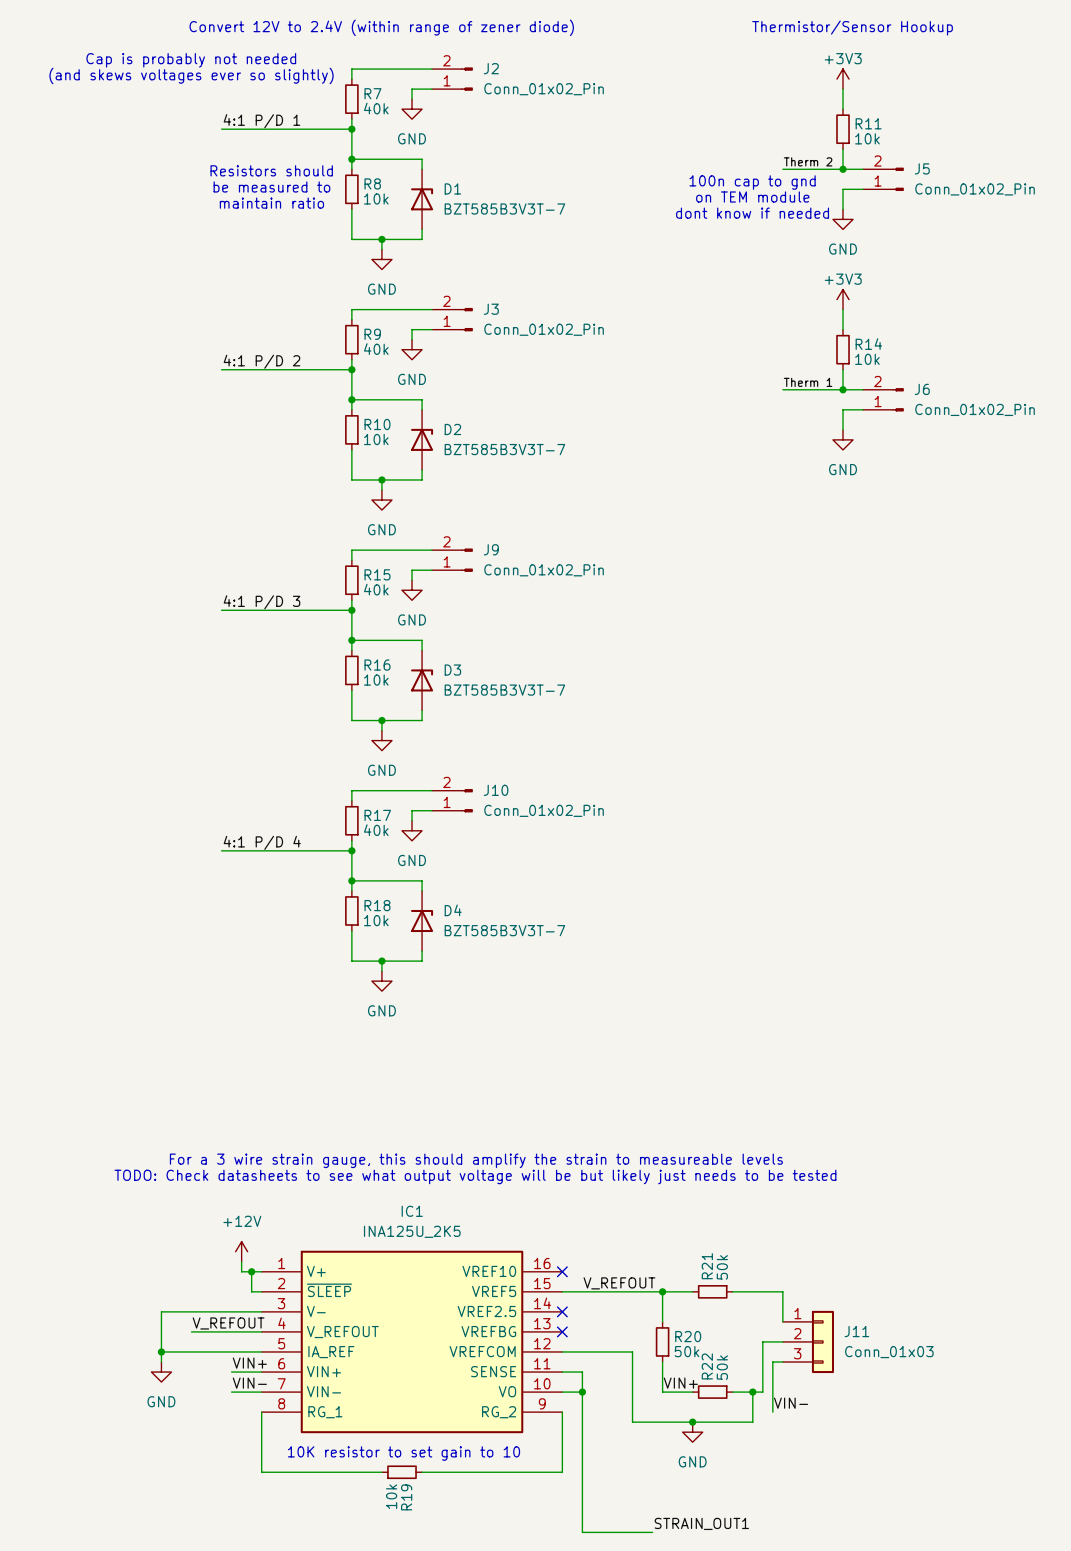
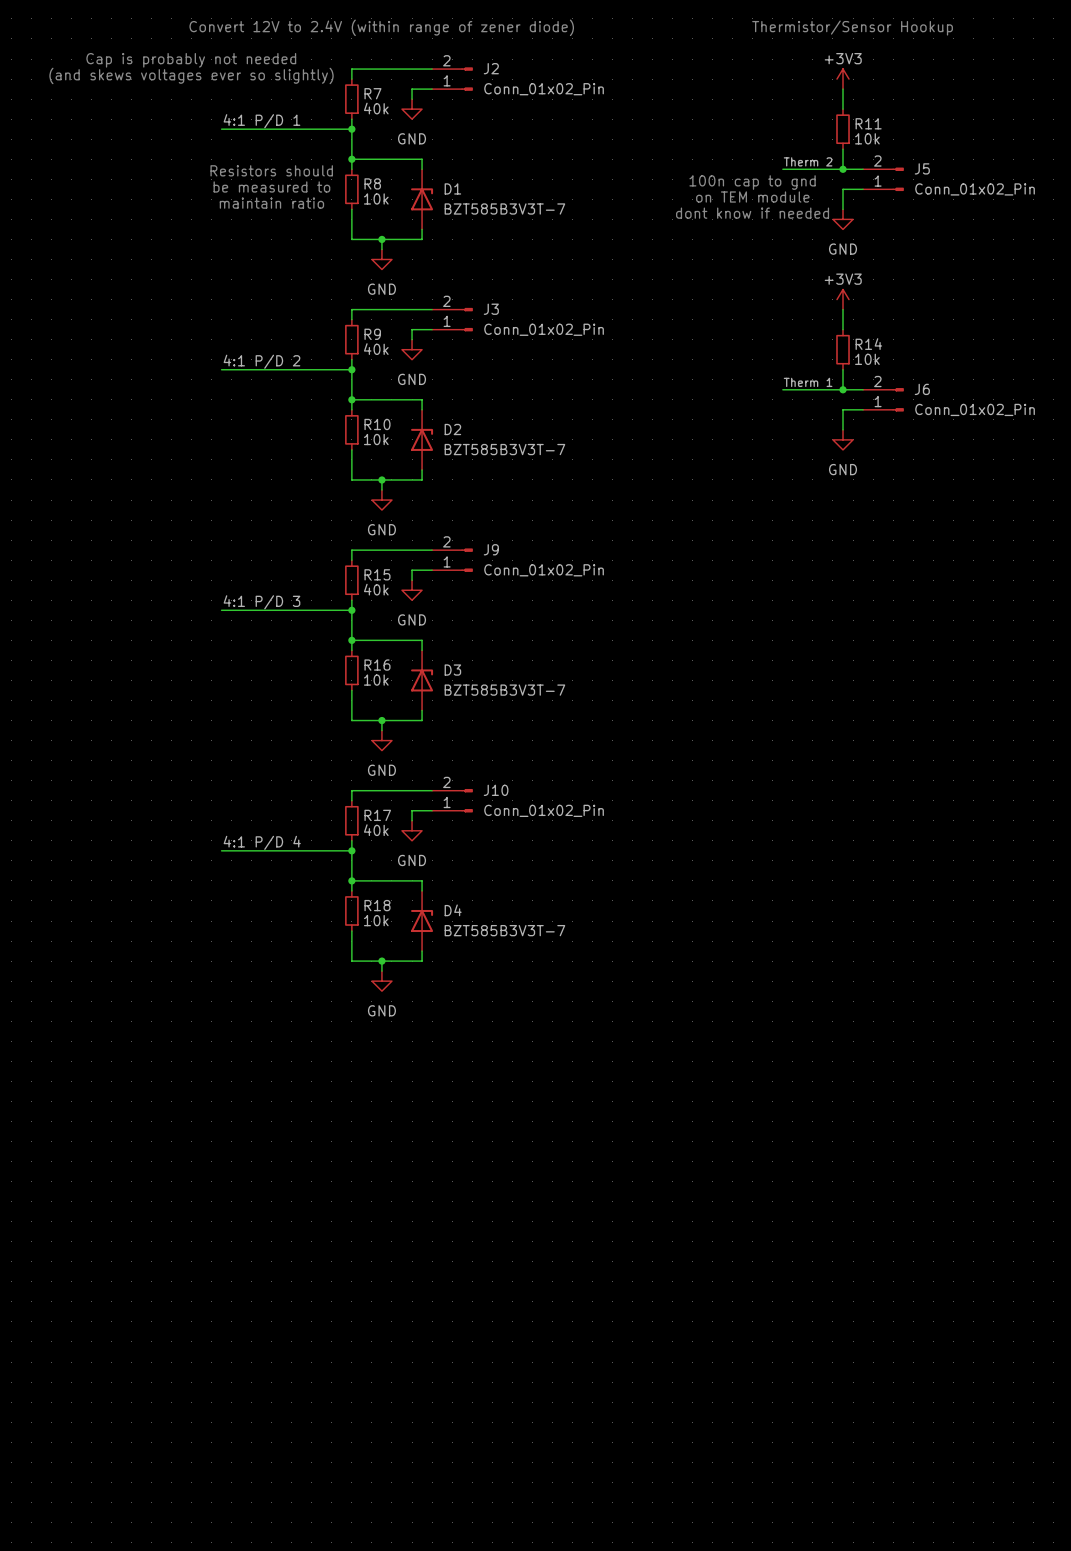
text: For a 3 wire strain gauge, this should amplify the strain to measureable levels (476, 1160) -> none
text: TODO: Check datasheets to see what output voltage will be but likely just needs to be tested (475, 1176) -> none
power symbol: +12V (241, 1251) -> none
wire: (241, 1261) (241, 1271) (261, 1271) -> none
wire: (251, 1271) (251, 1291) (261, 1291) -> none
junction: (251, 1271) -> none
no-connect mark: (562, 1271) -> none
label: V_REFOUT (619, 1283) -> none
wire: (562, 1291) (692, 1291) -> none
wire: (662, 1291) (662, 1321) -> none
junction: (662, 1291) -> none
R21: 50k (712, 1291) -> none
wire: (732, 1291) (782, 1291) (782, 1321) -> none
wire: (261, 1311) (161, 1311) (161, 1362) -> none
no-connect mark: (562, 1311) -> none
label: V_REFOUT (228, 1323) -> none
wire: (191, 1331) (261, 1331) -> none
no-connect mark: (562, 1331) -> none
IC1: INA125U_2K5 (412, 1341) -> none
R20: 50k (662, 1341) -> none
wire: (782, 1341) (762, 1341) (762, 1392) (732, 1392) -> none
J11: Conn_01x03 (808, 1341) -> none
wire: (161, 1351) (261, 1351) -> none
junction: (161, 1351) -> none
wire: (562, 1351) (632, 1351) (632, 1422) (752, 1422) (752, 1392) -> none
wire: (662, 1362) (662, 1392) (692, 1392) -> none
wire: (782, 1362) (772, 1362) (772, 1412) -> none
label: VIN+ (249, 1363) -> none
power symbol: GND (161, 1372) -> none
wire: (231, 1372) (261, 1372) -> none
wire: (562, 1372) (582, 1372) (582, 1532) (652, 1532) -> none
label: VIN- (249, 1383) -> none
label: VIN+ (680, 1383) -> none
wire: (231, 1392) (261, 1392) -> none
wire: (562, 1392) (582, 1392) -> none
junction: (582, 1392) -> none
R22: 50k (712, 1392) -> none
junction: (752, 1392) -> none
label: VIN- (791, 1403) -> none
wire: (261, 1412) (261, 1472) (381, 1472) -> none
wire: (562, 1412) (562, 1472) (422, 1472) -> none
junction: (692, 1422) -> none
power symbol: GND (692, 1432) -> none
text: 10K resistor to set gain to 10 (404, 1453) -> none
R19: 10k (401, 1472) -> none
label: STRAIN_OUT1 (701, 1523) -> none

